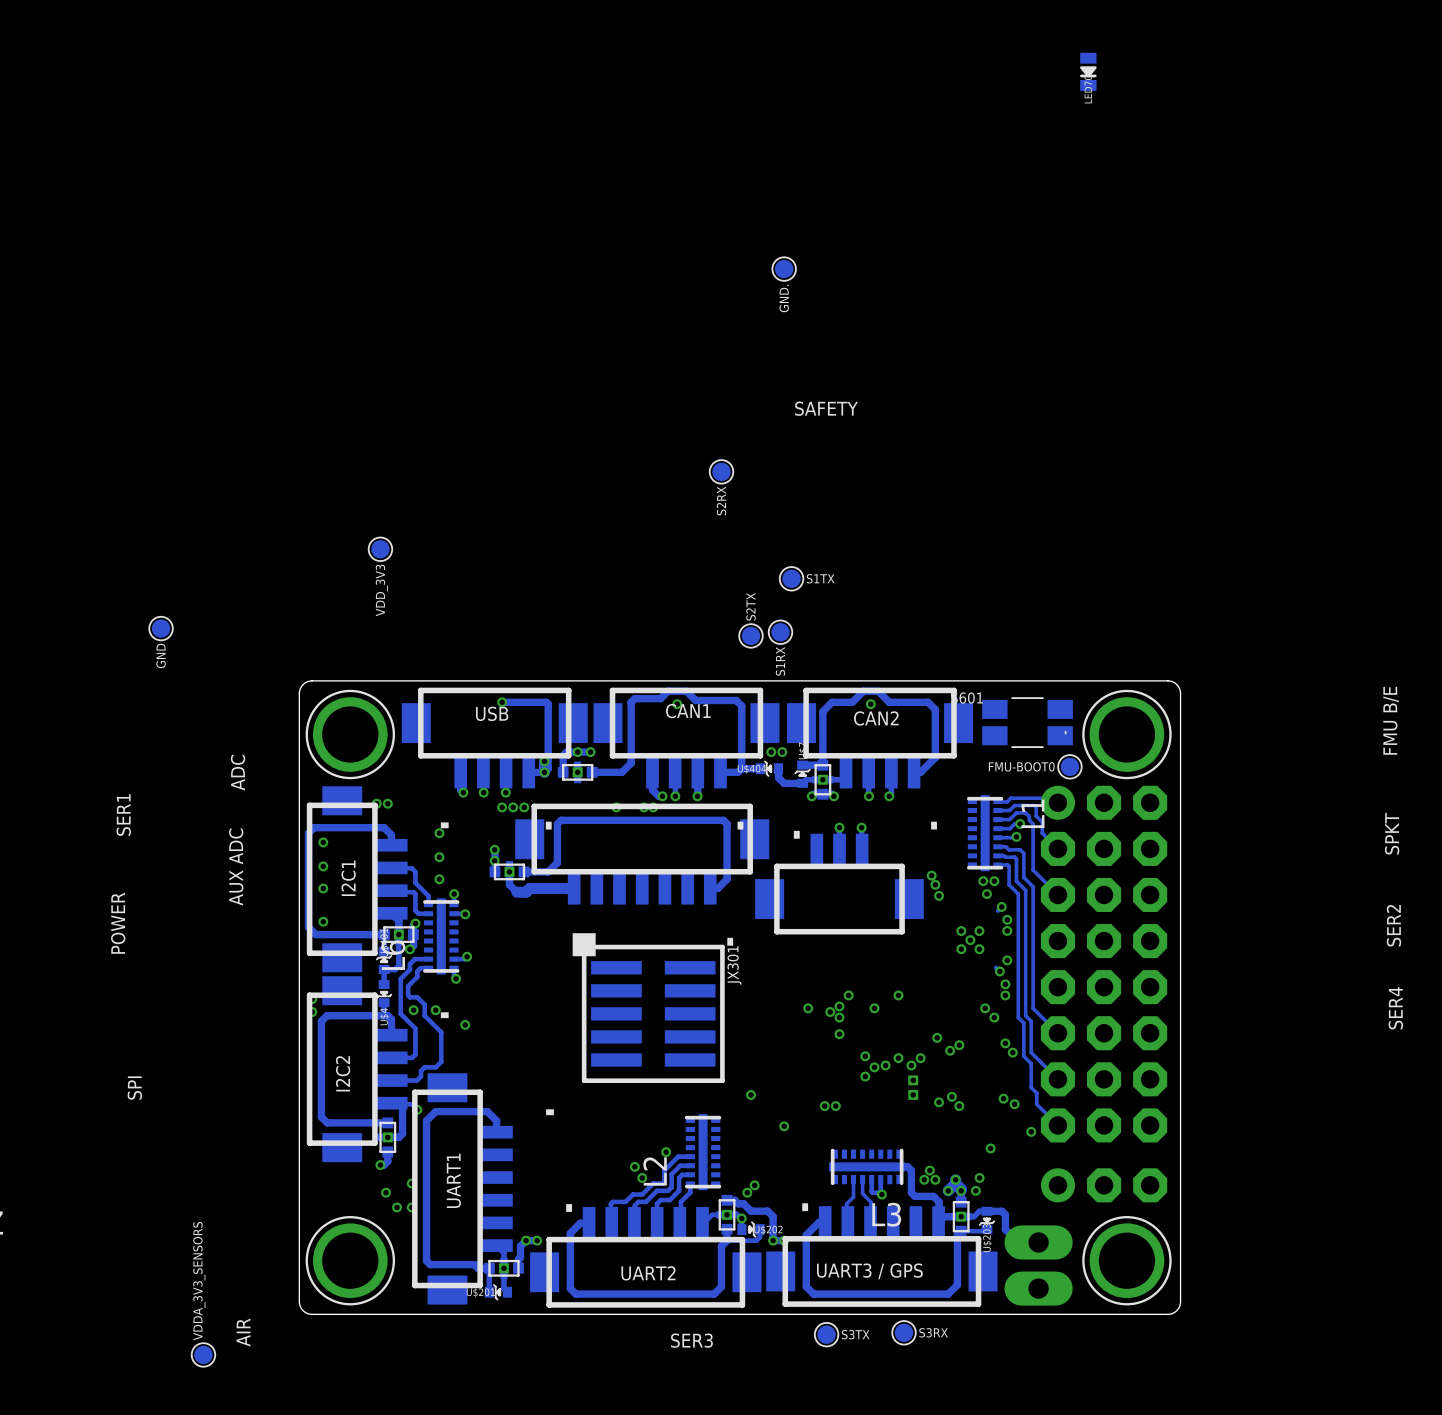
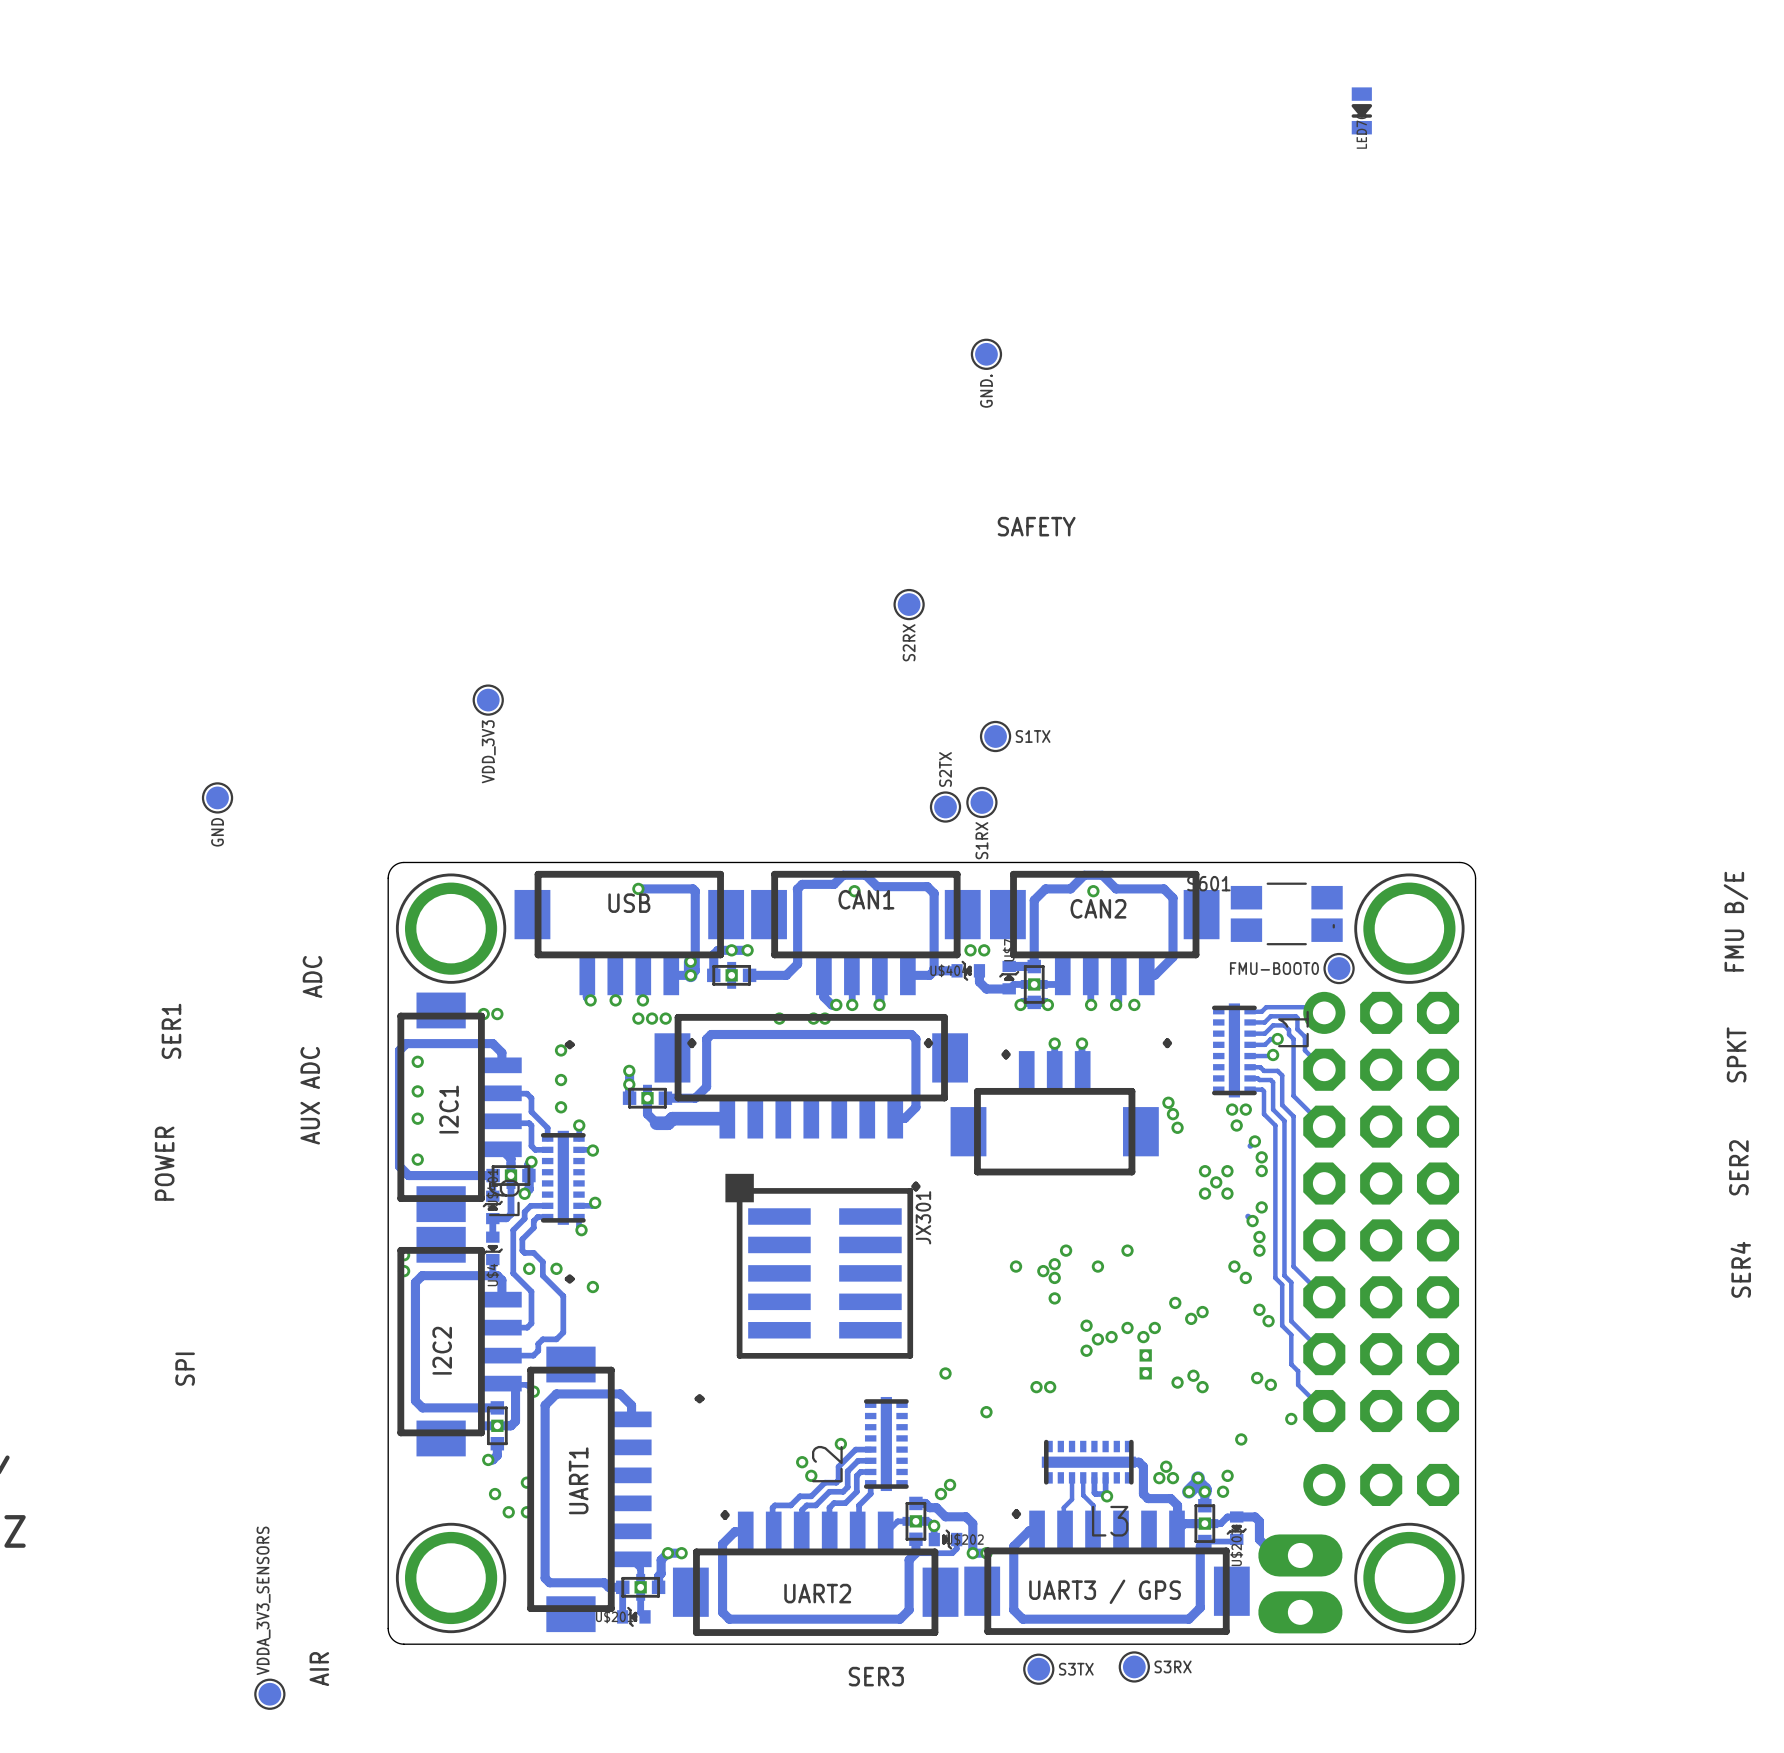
via: none -> (1134, 1004)

